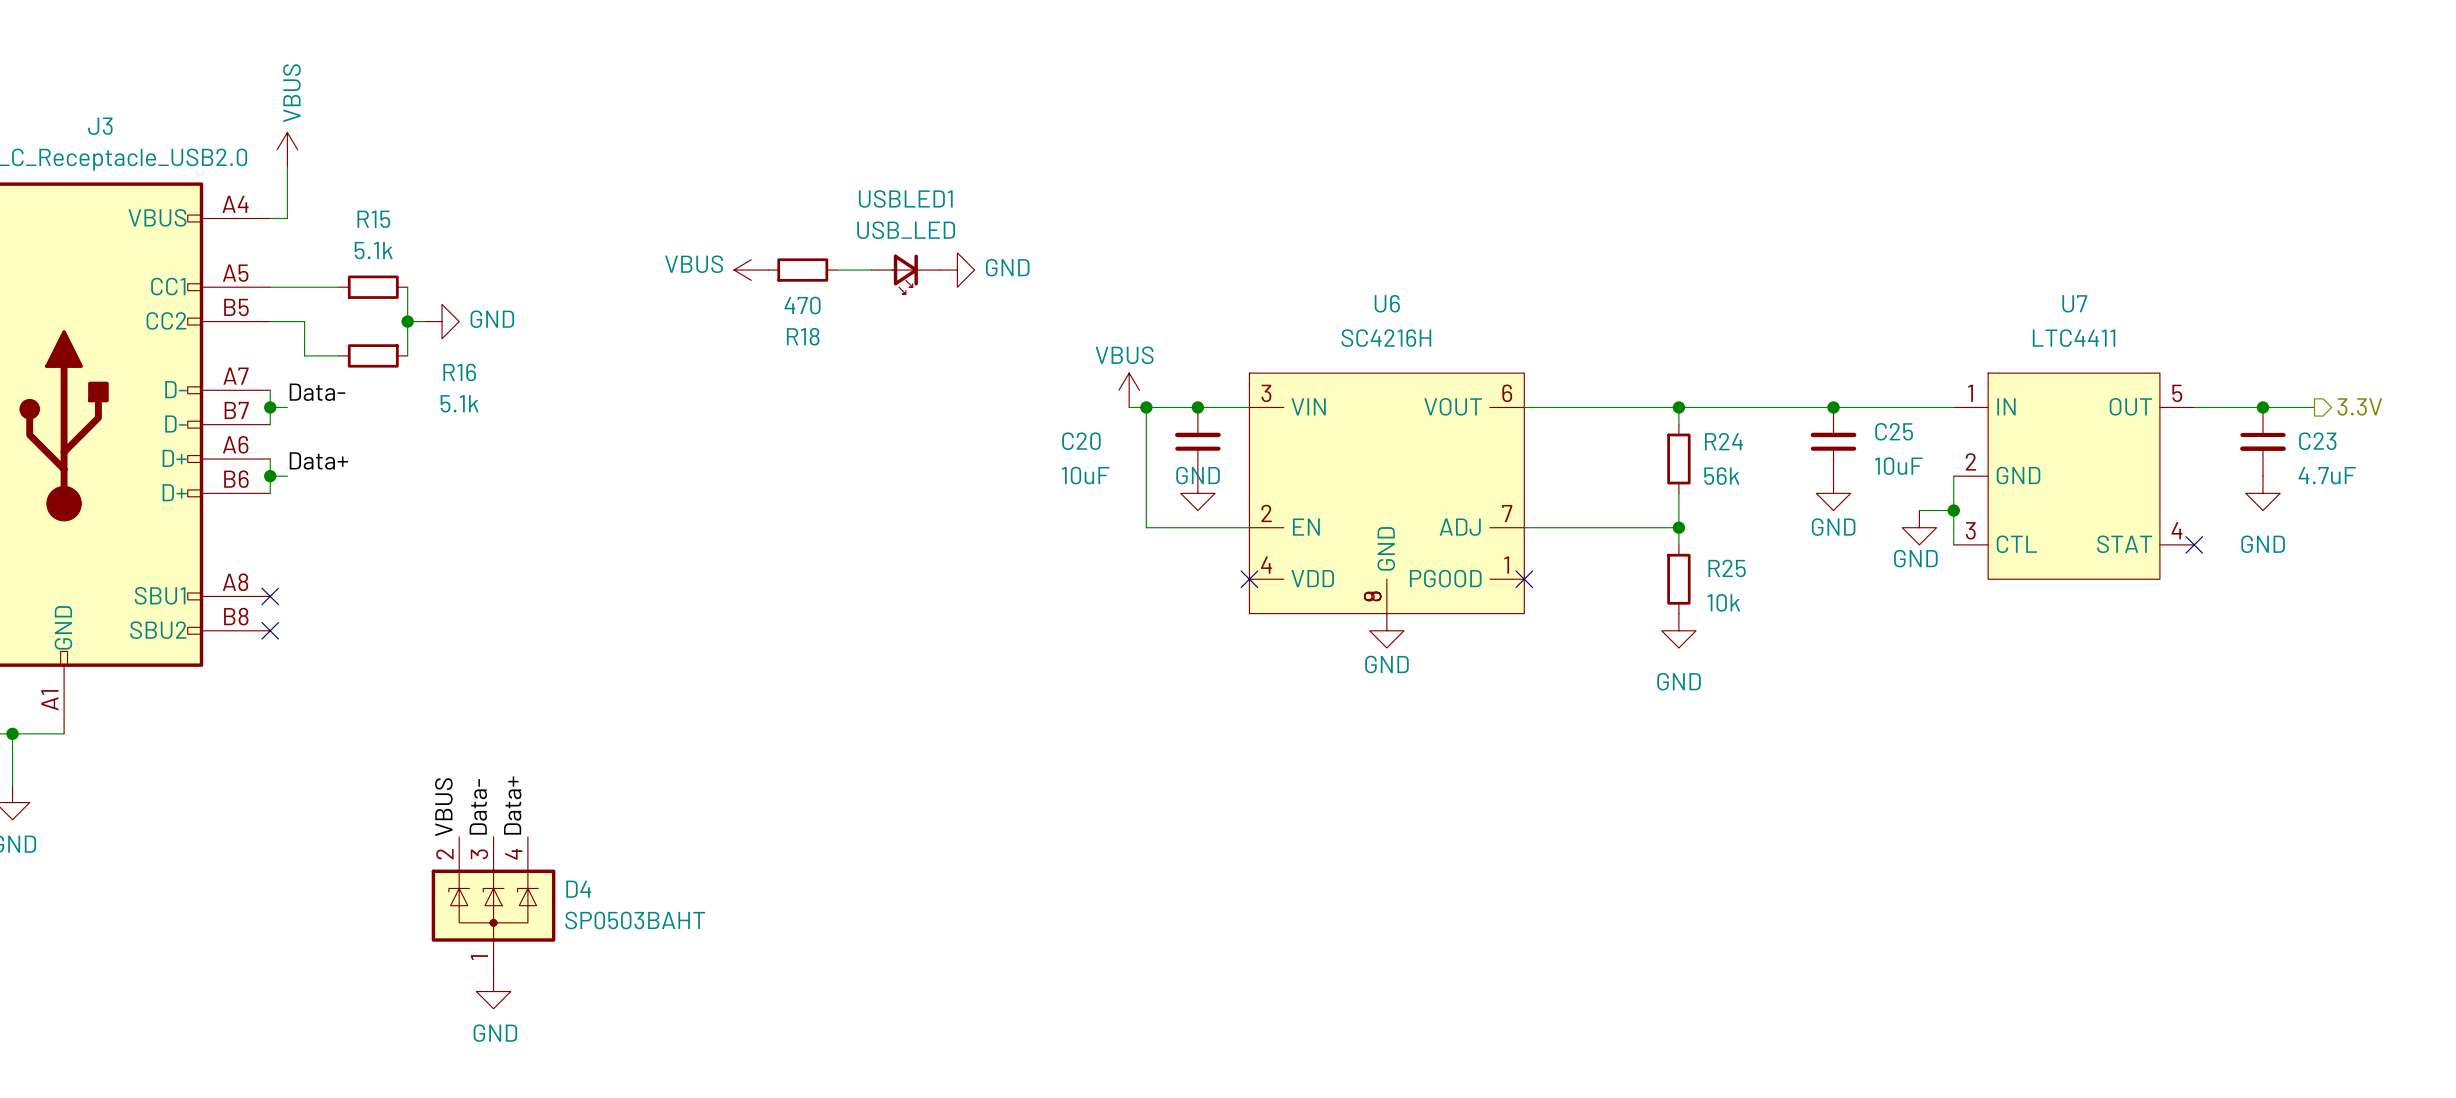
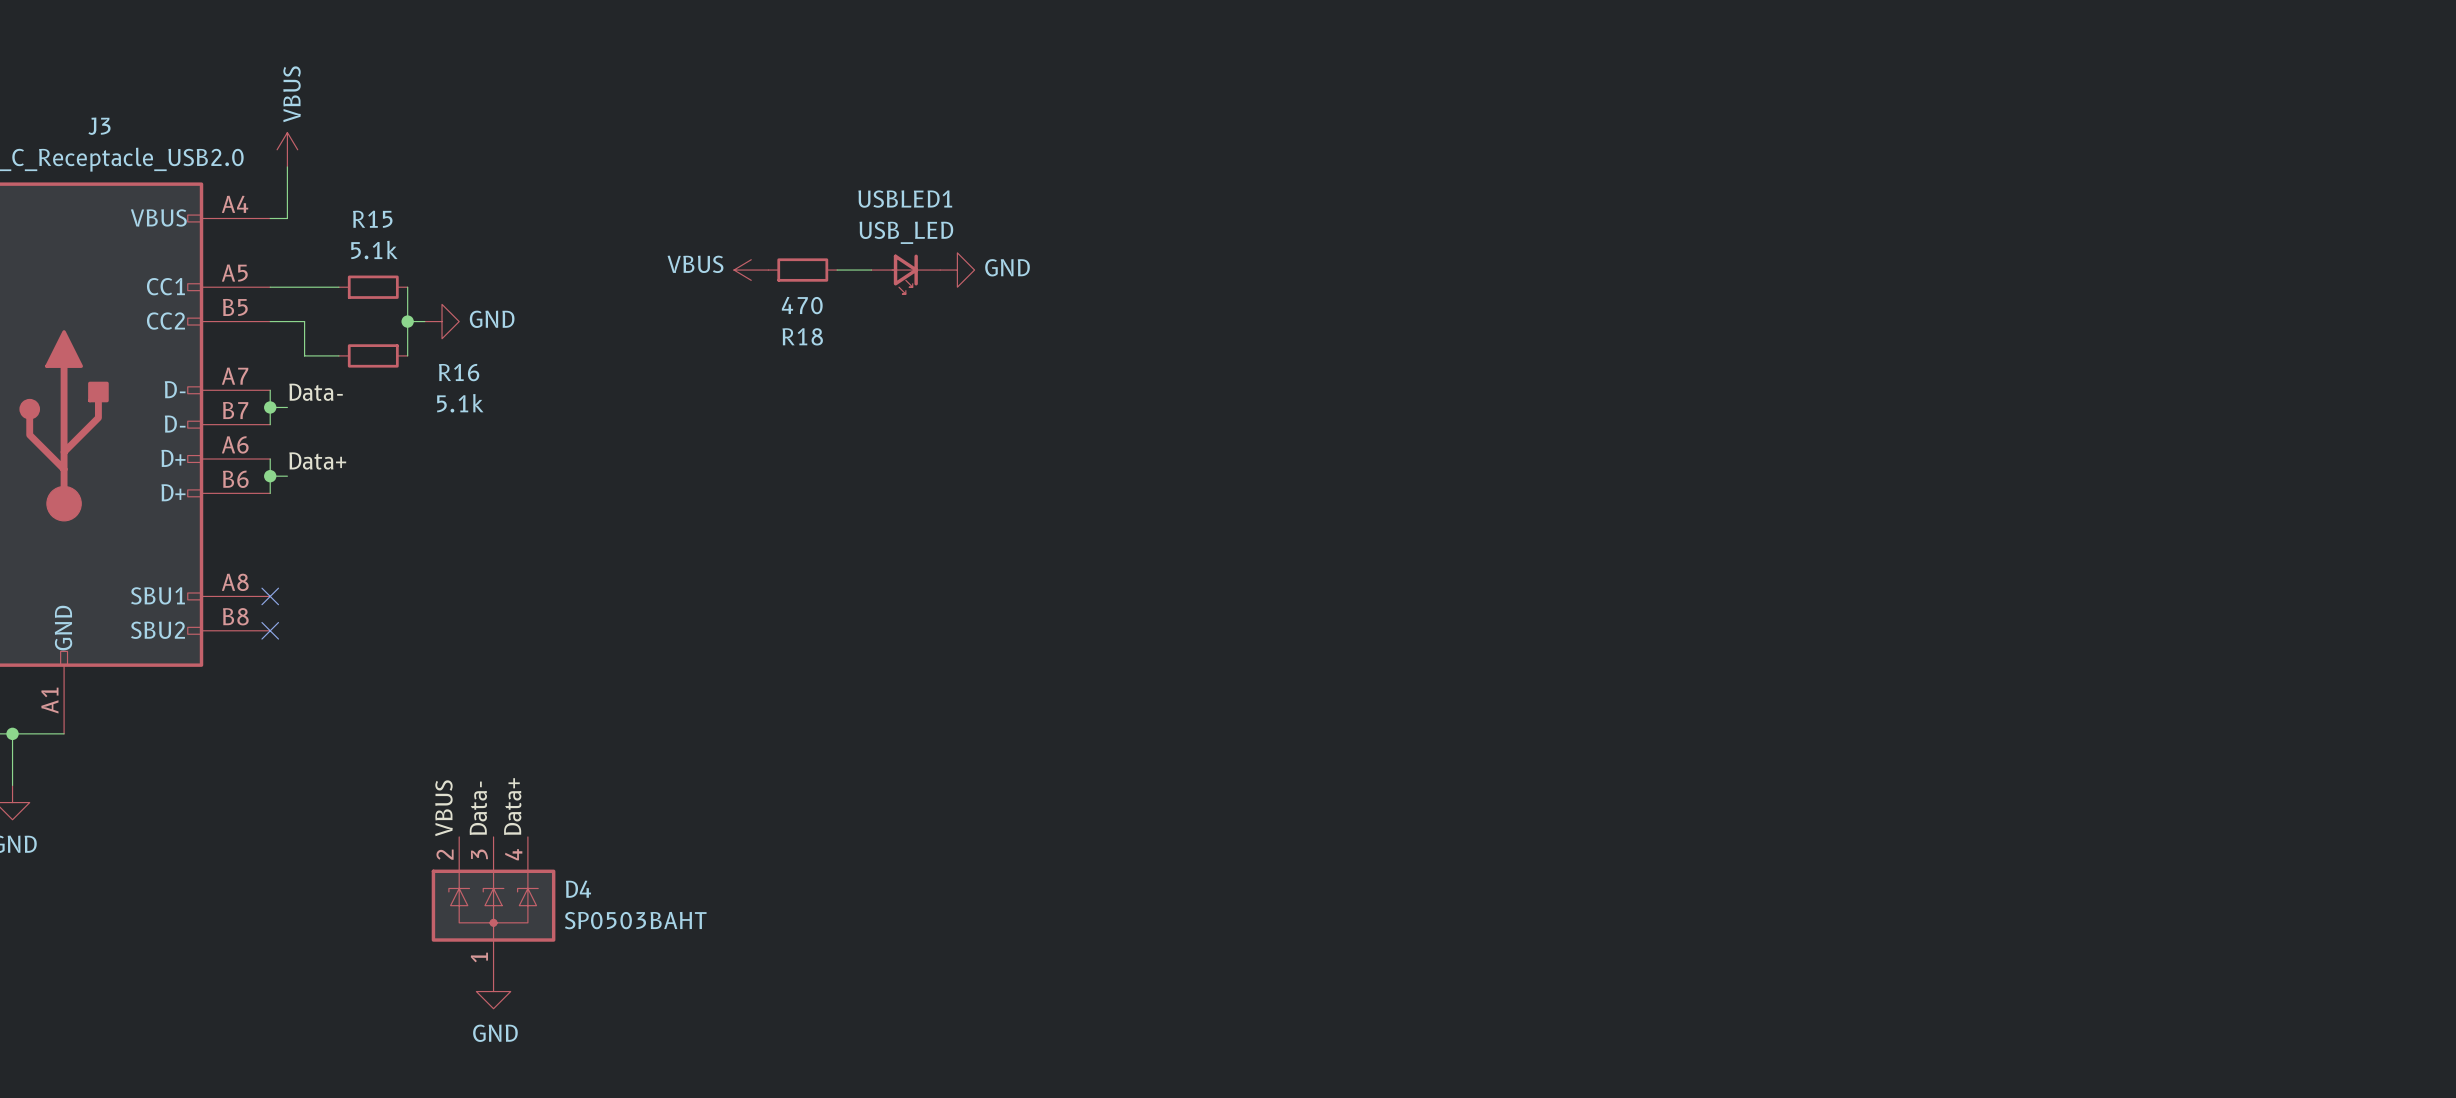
power symbol: VBUS (1129, 390) -> none
hierarchical label: 3.3V (2359, 406) -> none
wire: (1129, 407) (1249, 407) -> none
wire: (1146, 407) (1146, 527) (1249, 527) -> none
junction: (1146, 407) -> none
junction: (1197, 407) -> none
wire: (1524, 407) (1953, 407) -> none
wire: (1678, 407) (1678, 424) -> none
junction: (1678, 407) -> none
junction: (1833, 407) -> none
wire: (2194, 407) (2314, 407) -> none
junction: (2262, 407) -> none
C20: 10uF (1197, 441) -> none
C25: 10uF (1833, 441) -> none
C23: 4.7uF (2262, 441) -> none
R24: 56k (1678, 459) -> none
wire: (1953, 476) (1953, 544) -> none
U7: LTC4411 (2074, 476) -> none
power symbol: GND (1197, 493) -> none
U6: SC4216H (1386, 493) -> none
wire: (1678, 493) (1678, 544) -> none
power symbol: GND (1833, 493) -> none
power symbol: GND (2262, 493) -> none
wire: (1919, 510) (1953, 510) -> none
junction: (1953, 510) -> none
wire: (1524, 527) (1678, 527) -> none
junction: (1678, 527) -> none
power symbol: GND (1919, 527) -> none
no-connect mark: (2194, 544) -> none
no-connect mark: (1249, 579) -> none
no-connect mark: (1524, 579) -> none
R25: 10k (1678, 579) -> none
power symbol: GND (1386, 630) -> none
power symbol: GND (1678, 630) -> none

